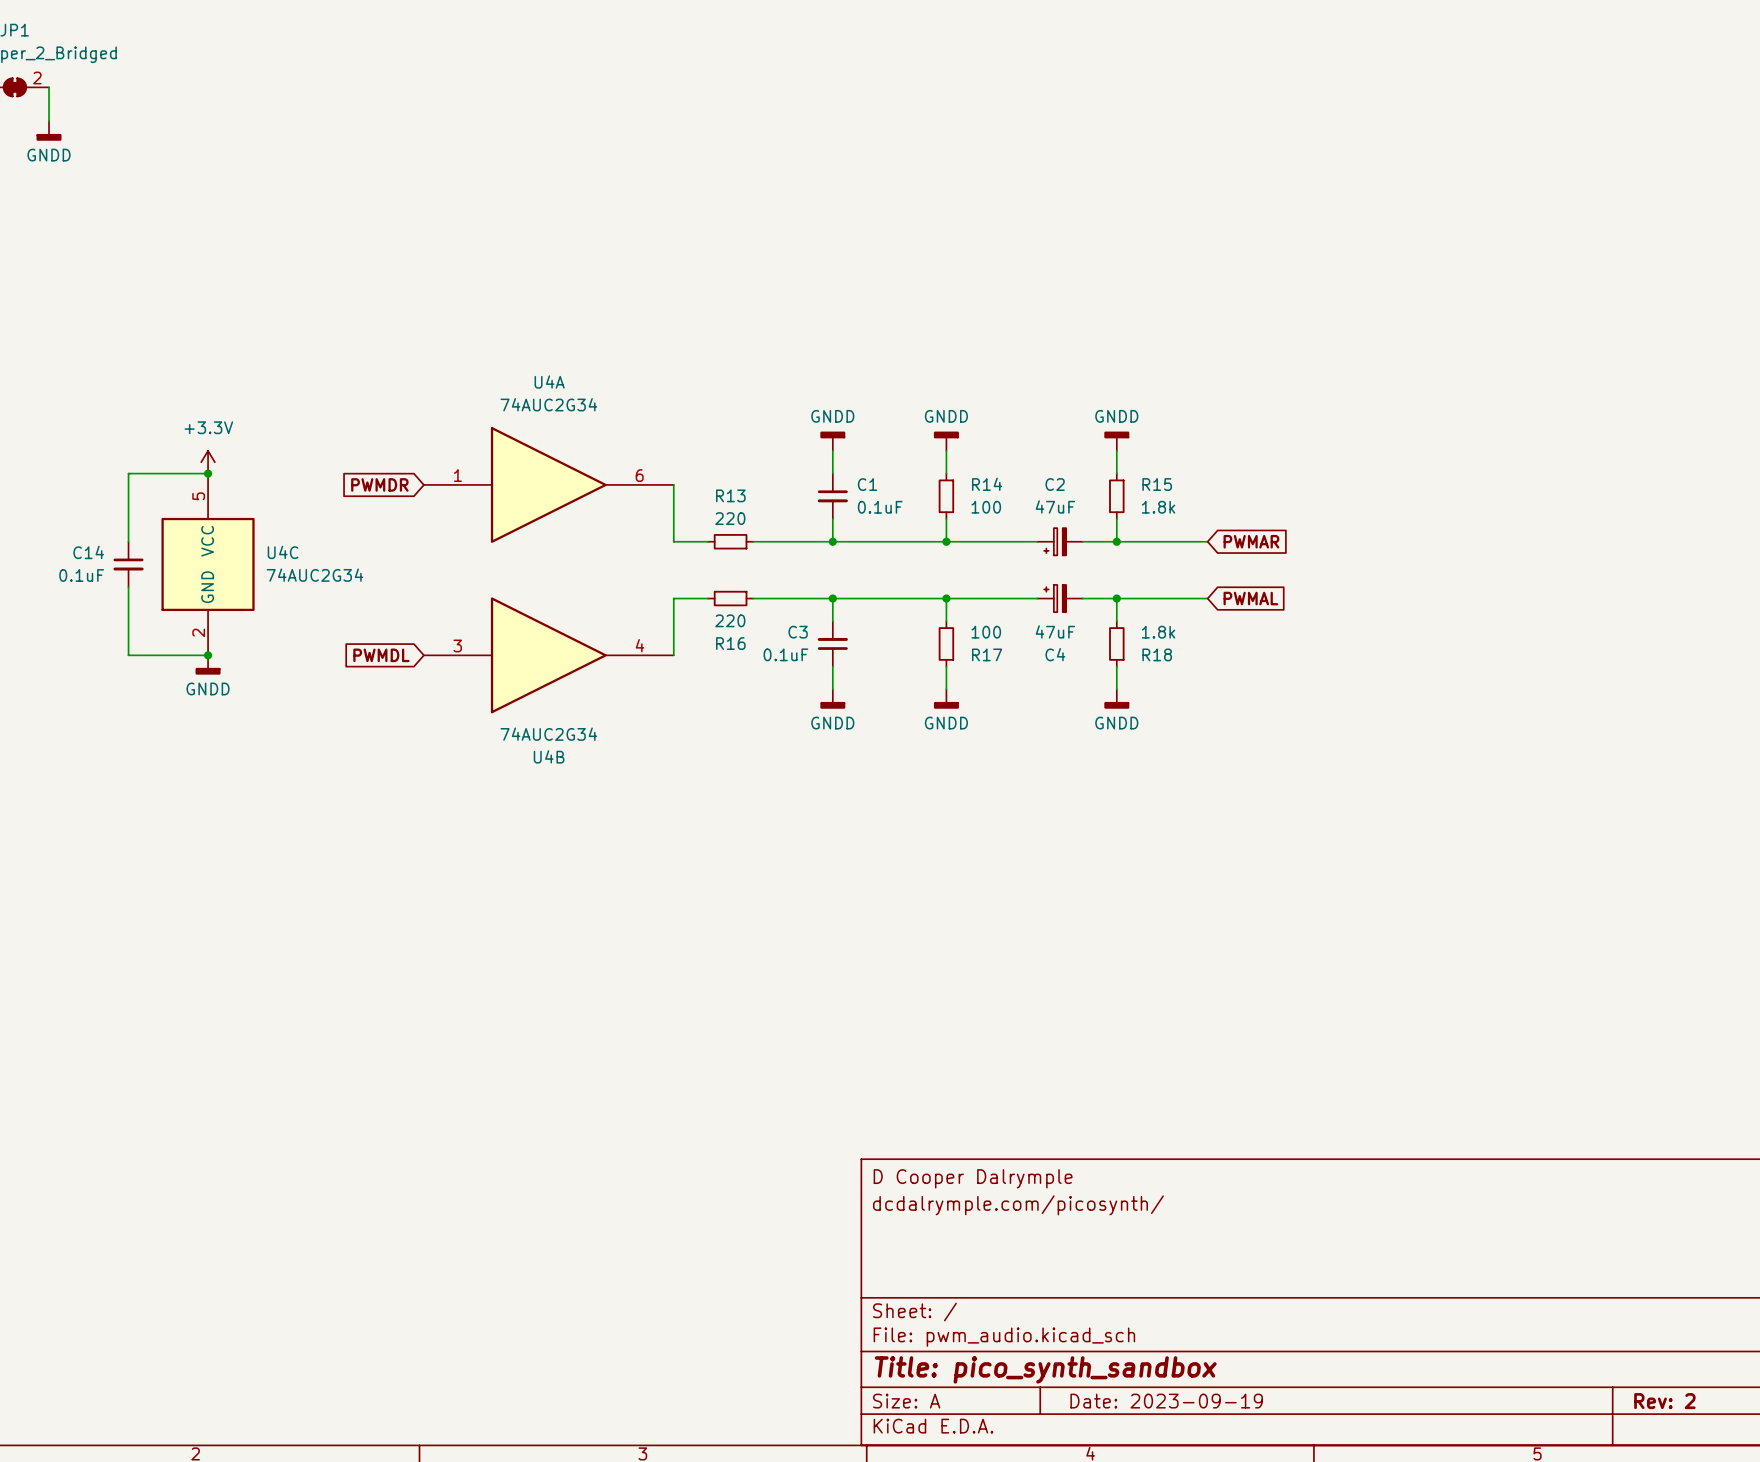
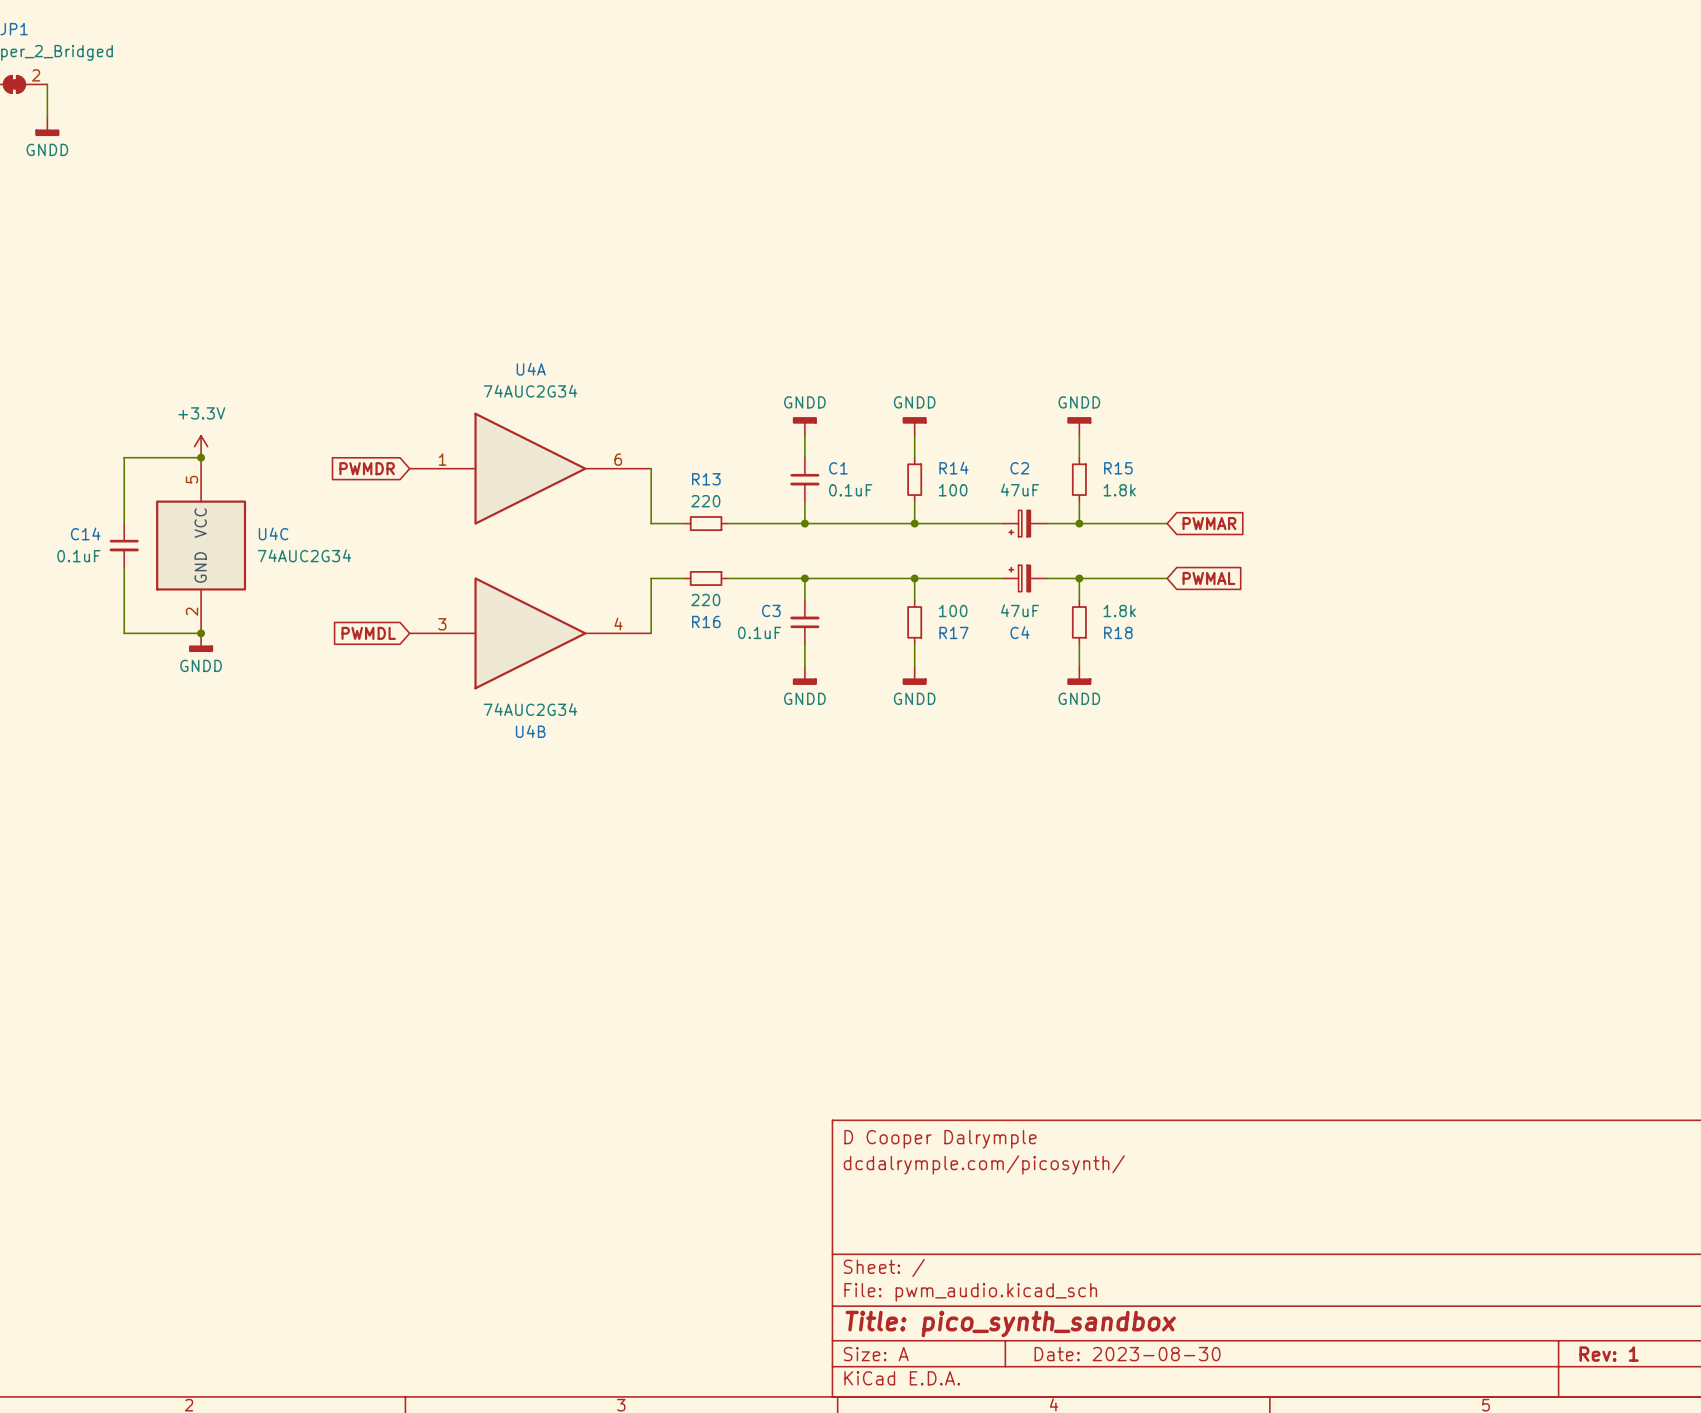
title block: Date: 2023-09-19 (1166, 1401) -> Date: 2023-08-30 (1127, 1354)
title block: Rev: 2 (1664, 1401) -> Rev: 1 (1609, 1354)

